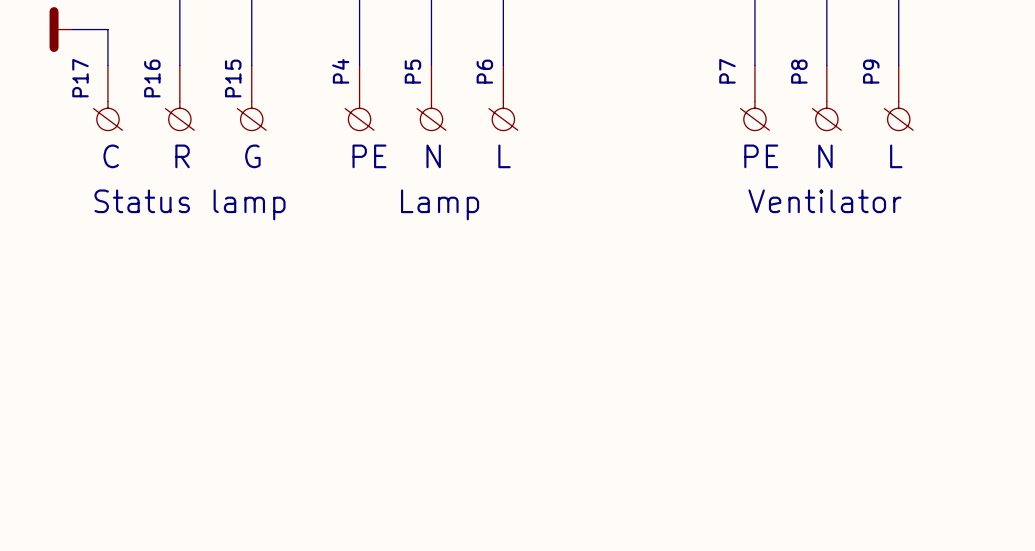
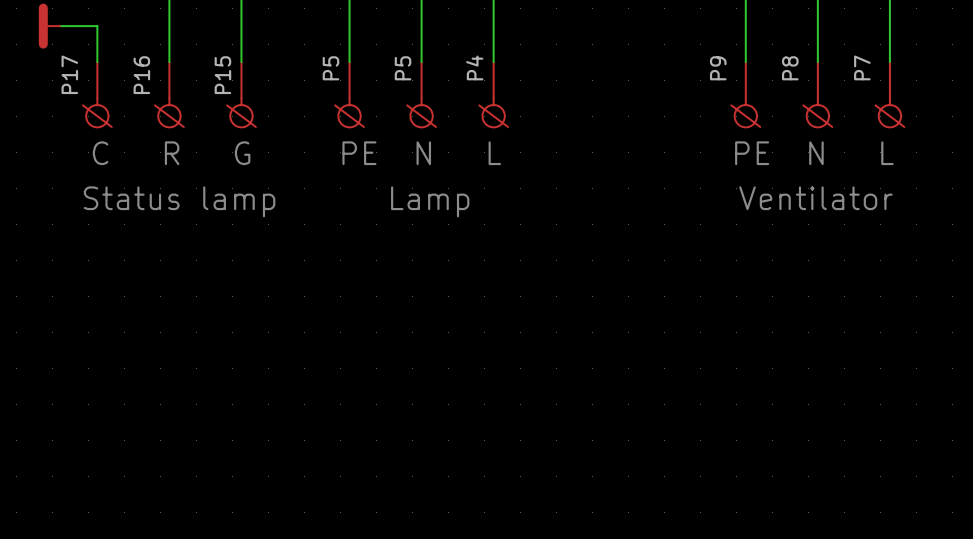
P4 name: P4 (340, 71) -> P5 (330, 68)
P6 name: P6 (484, 71) -> P4 (474, 67)
P7 name: P7 (727, 71) -> P9 (718, 68)
P9 name: P9 (871, 71) -> P7 (862, 67)

